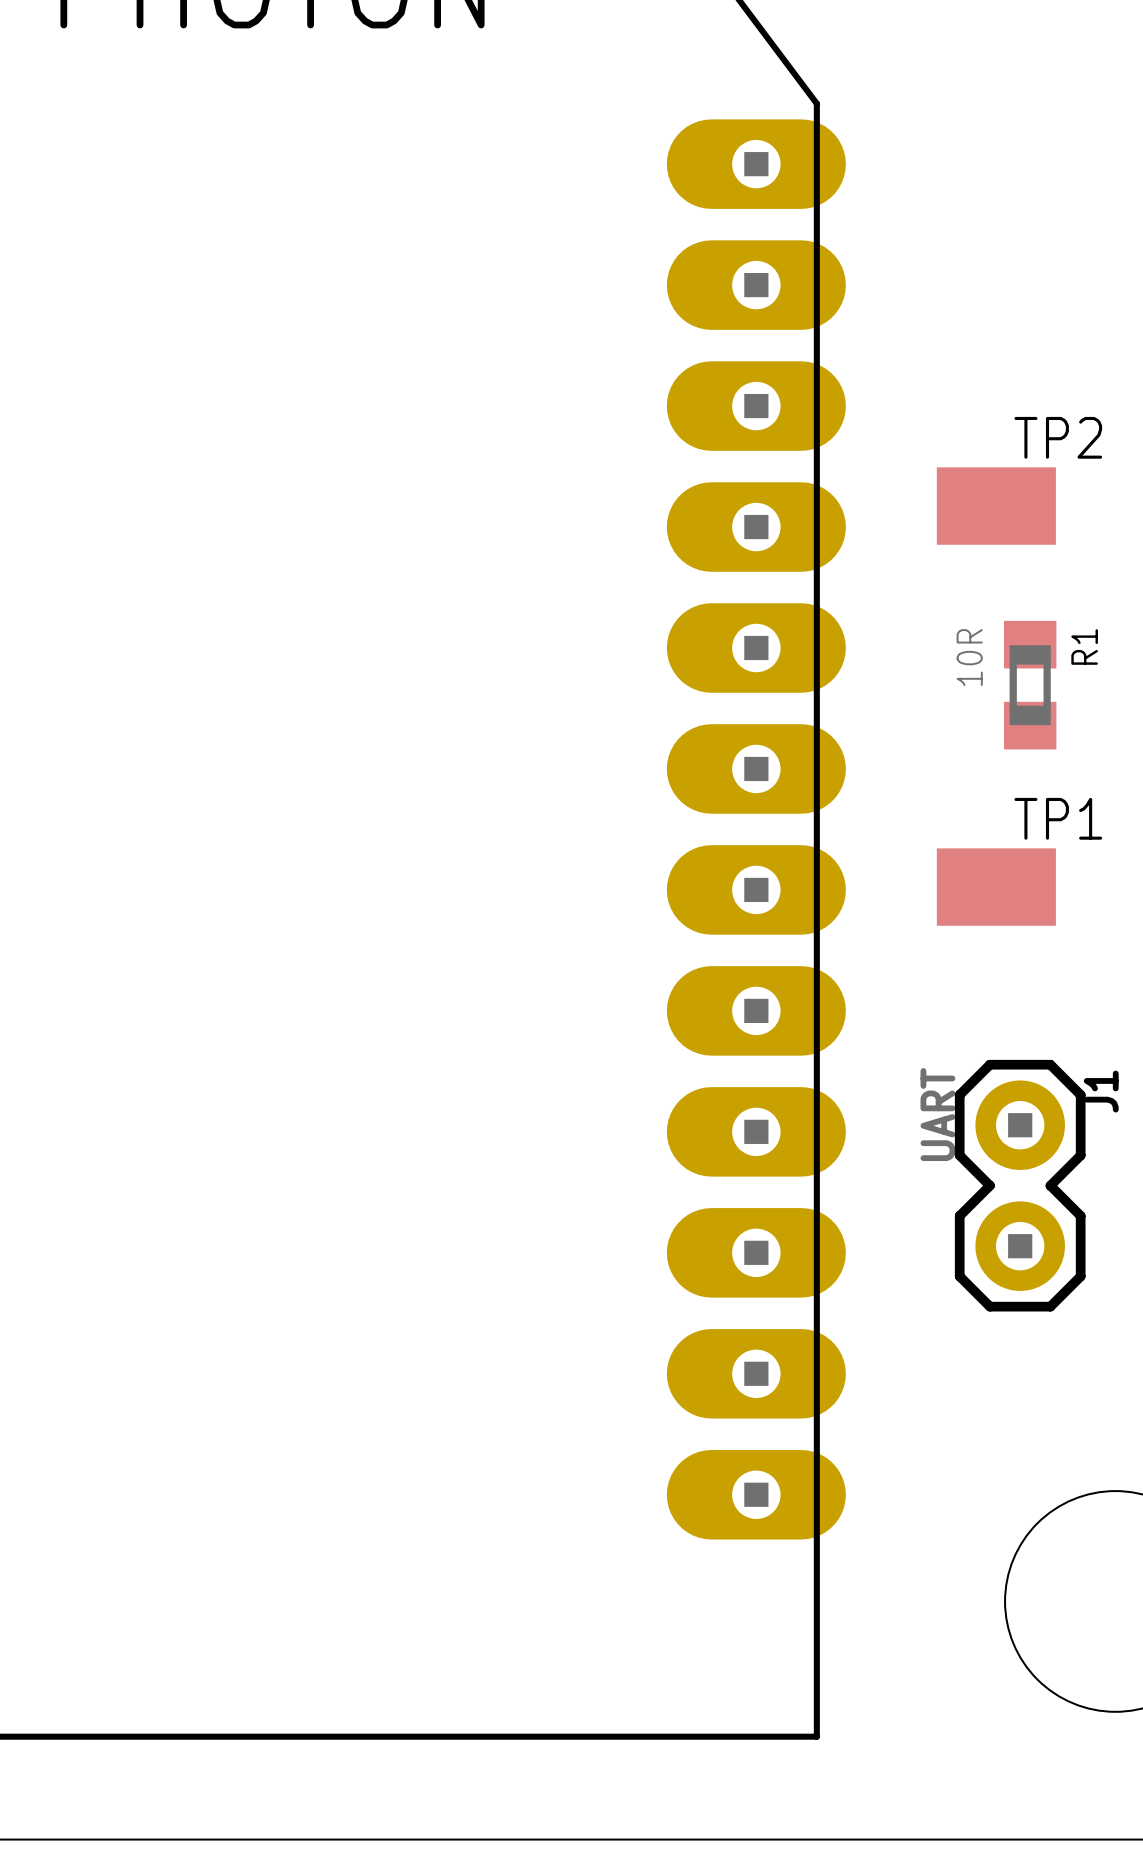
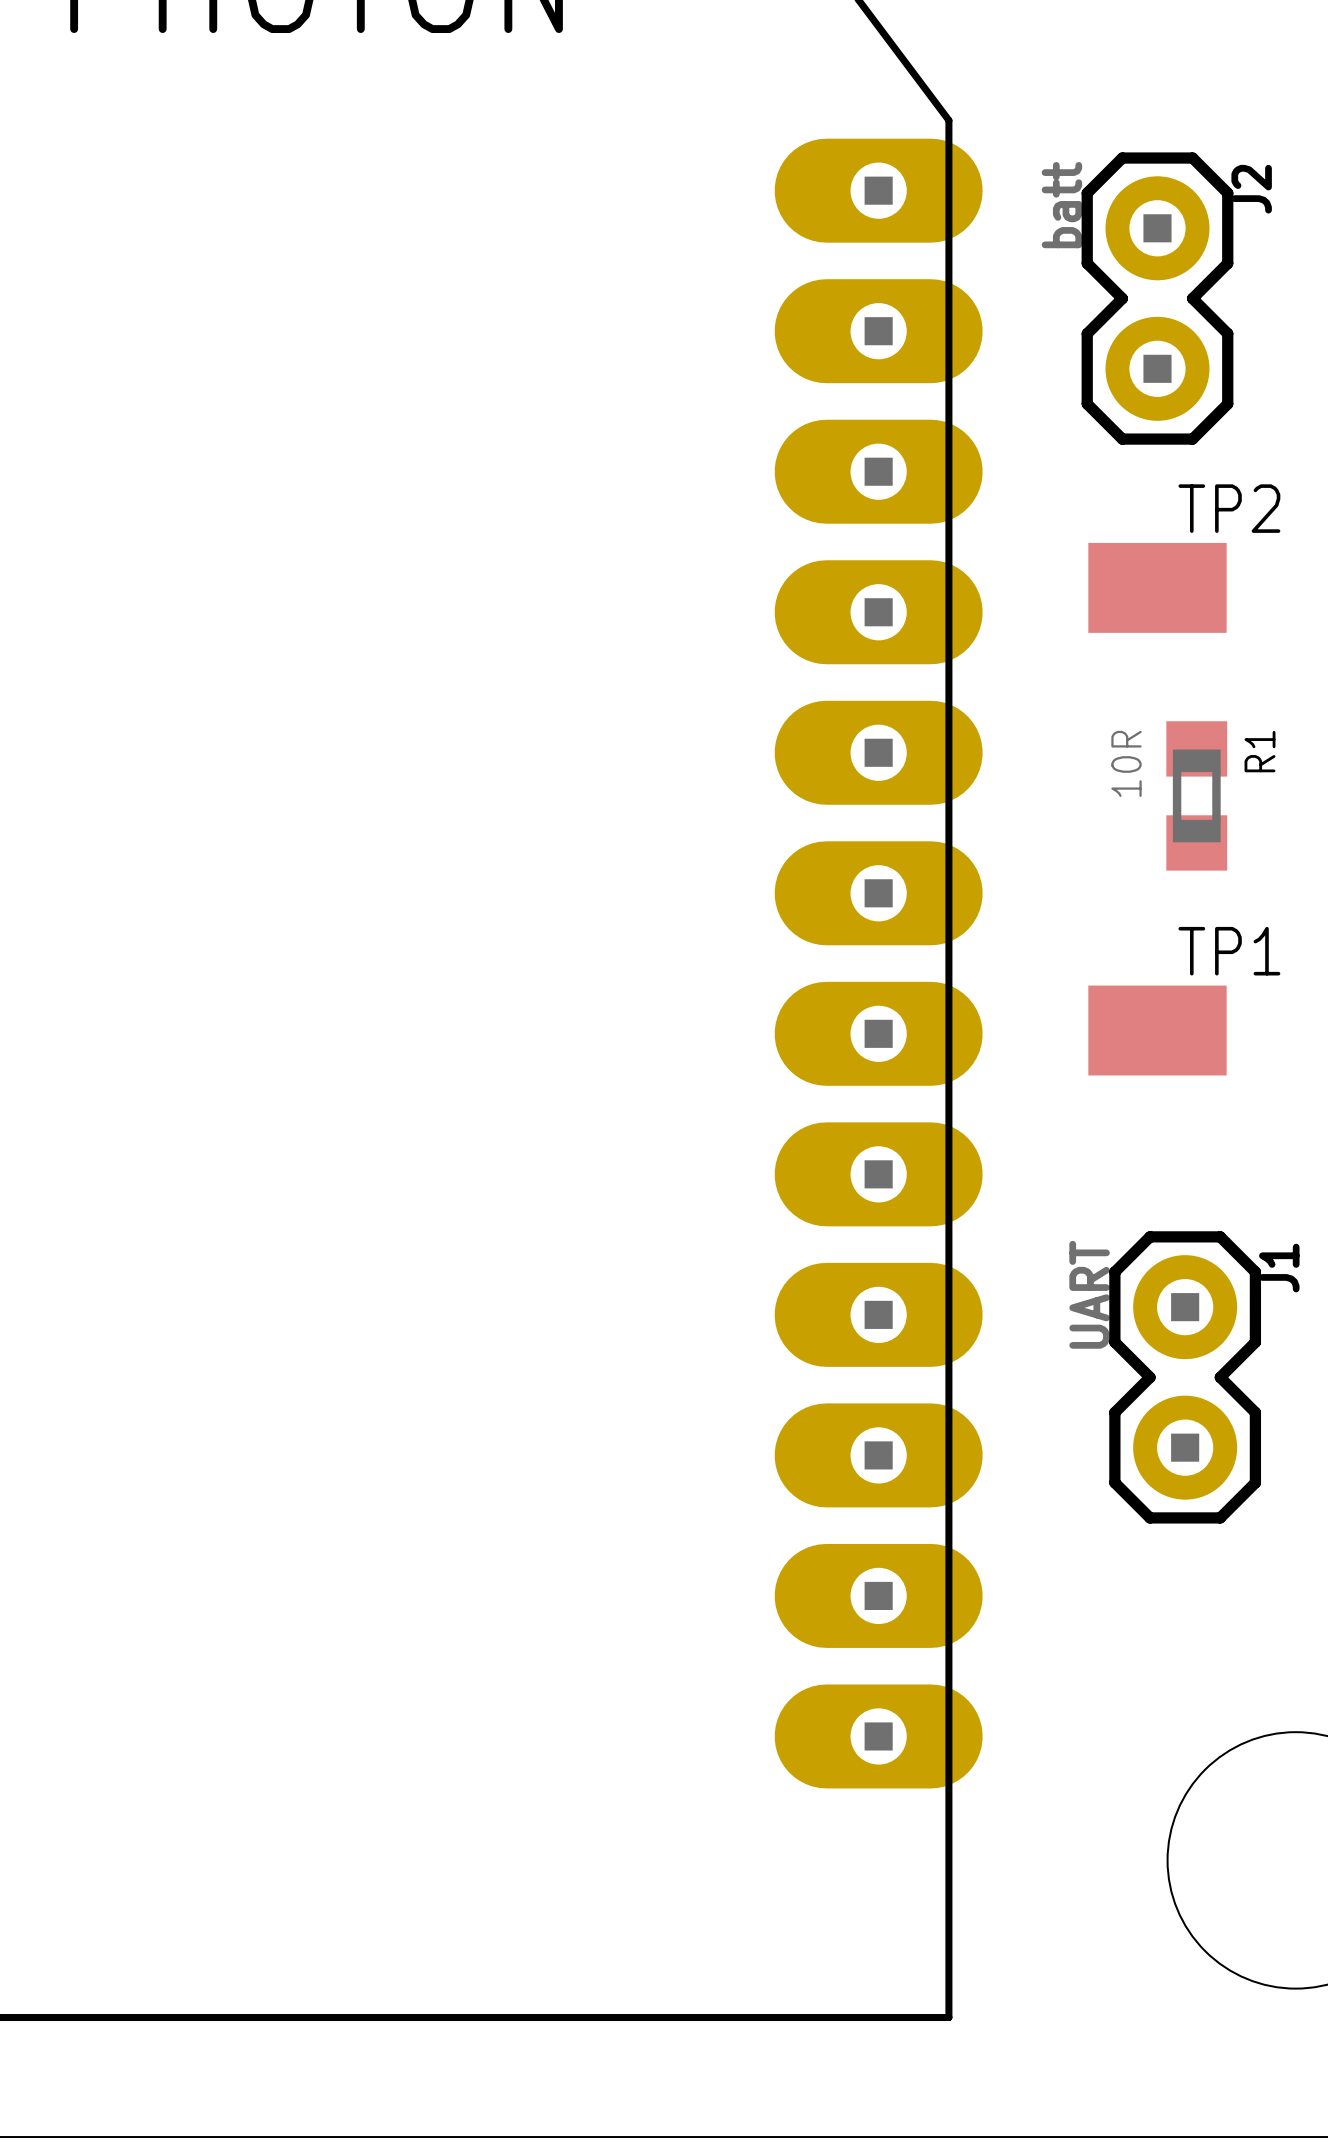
J2: none -> batt (1157, 298)

